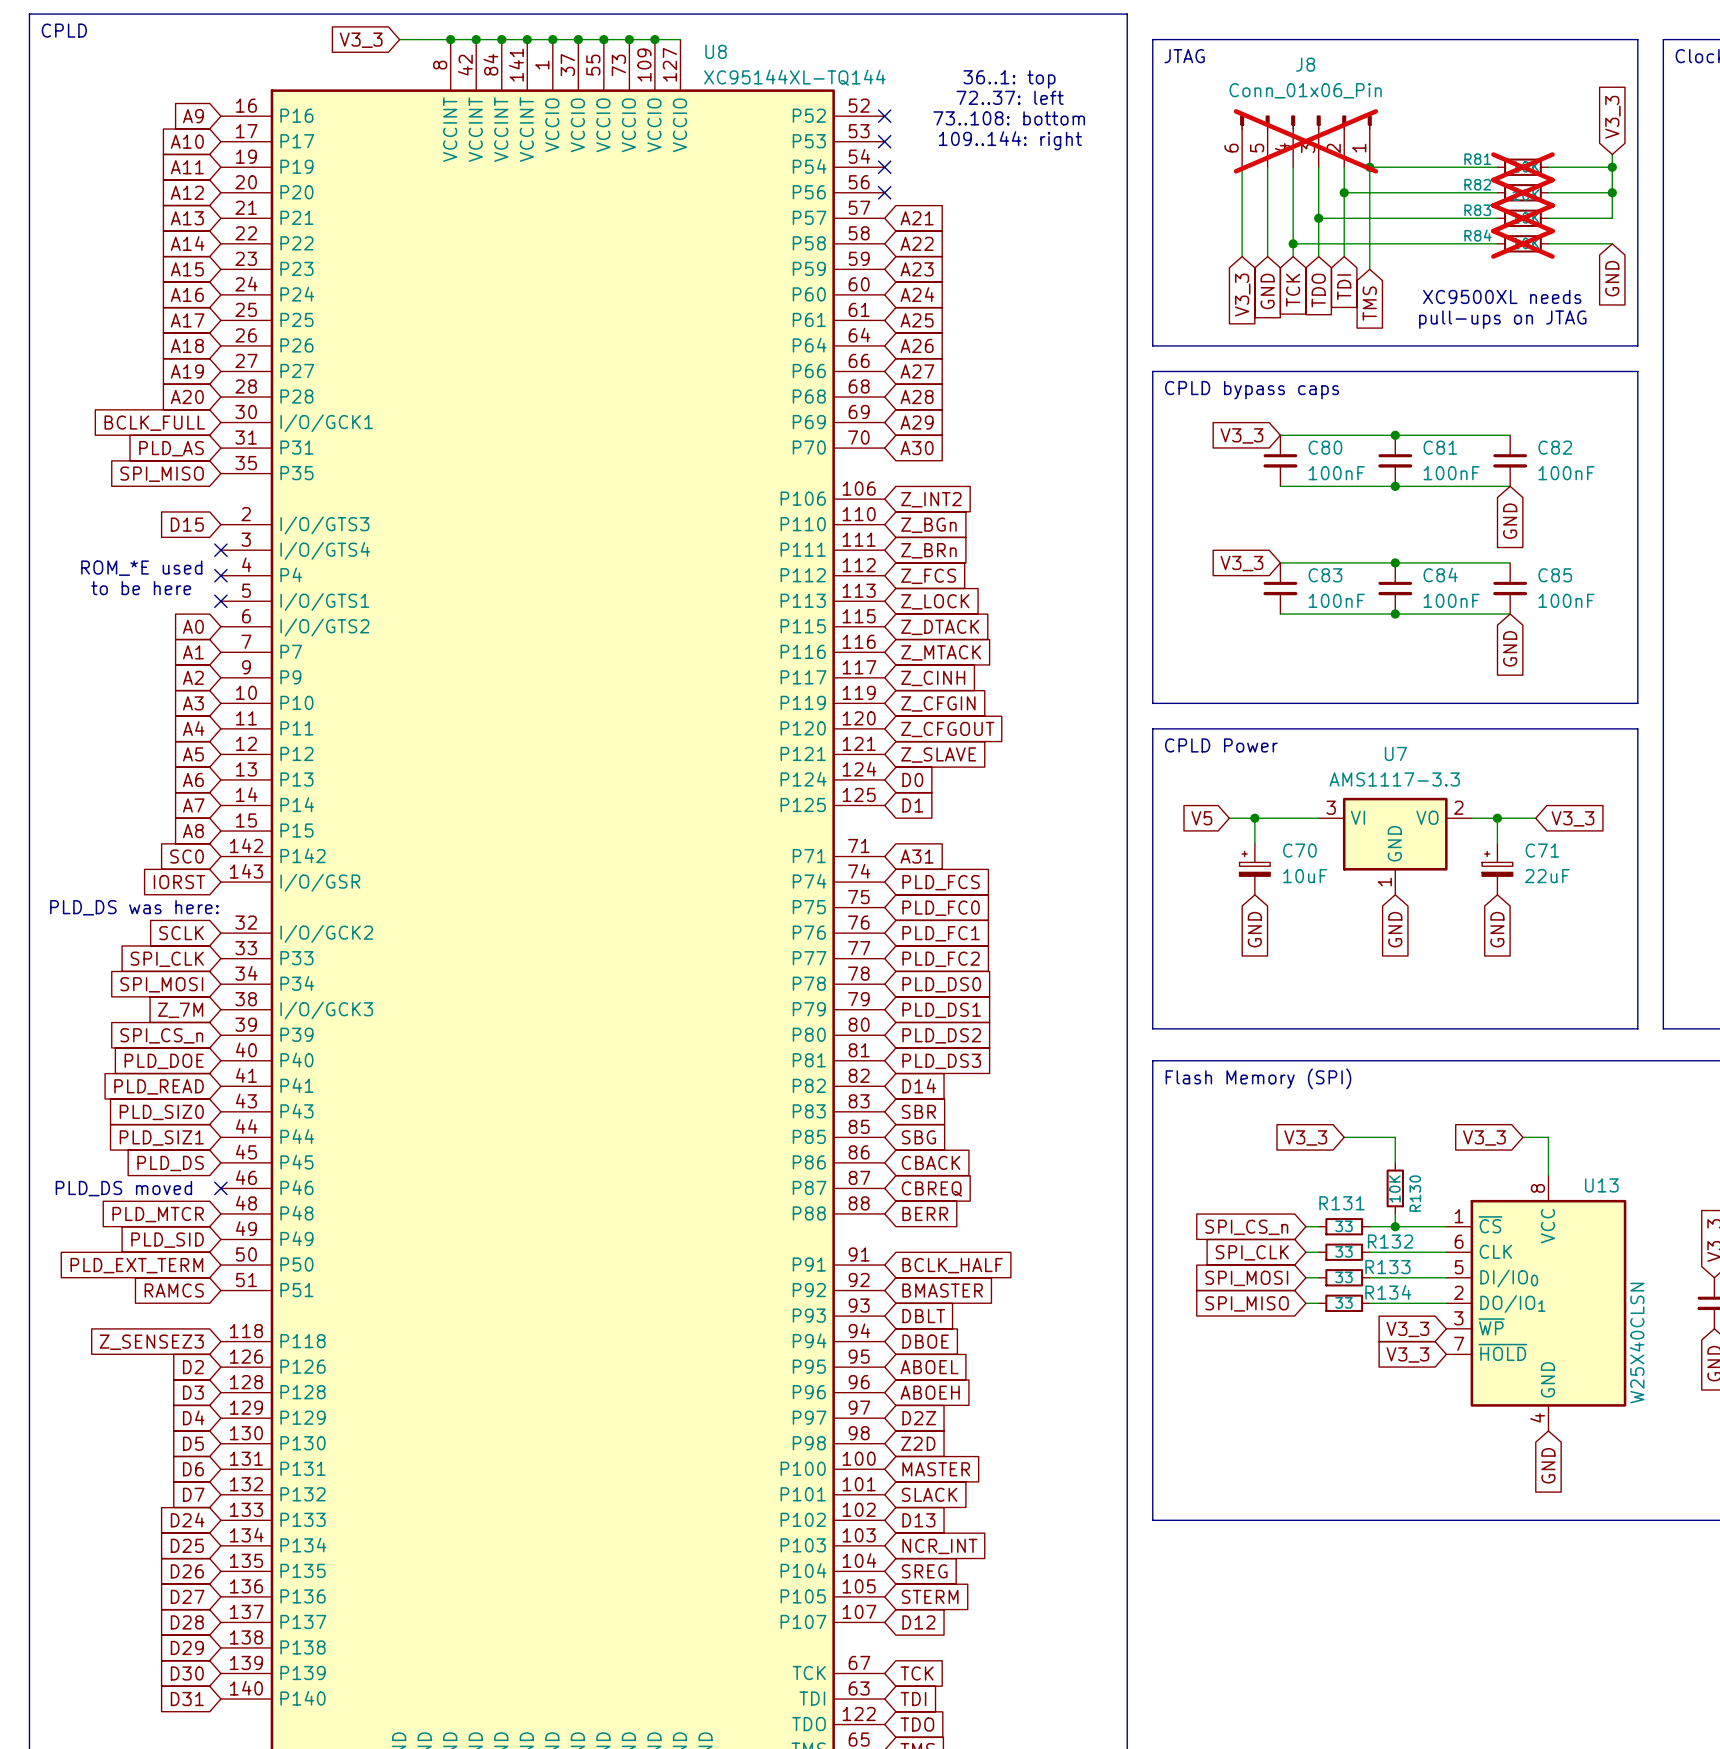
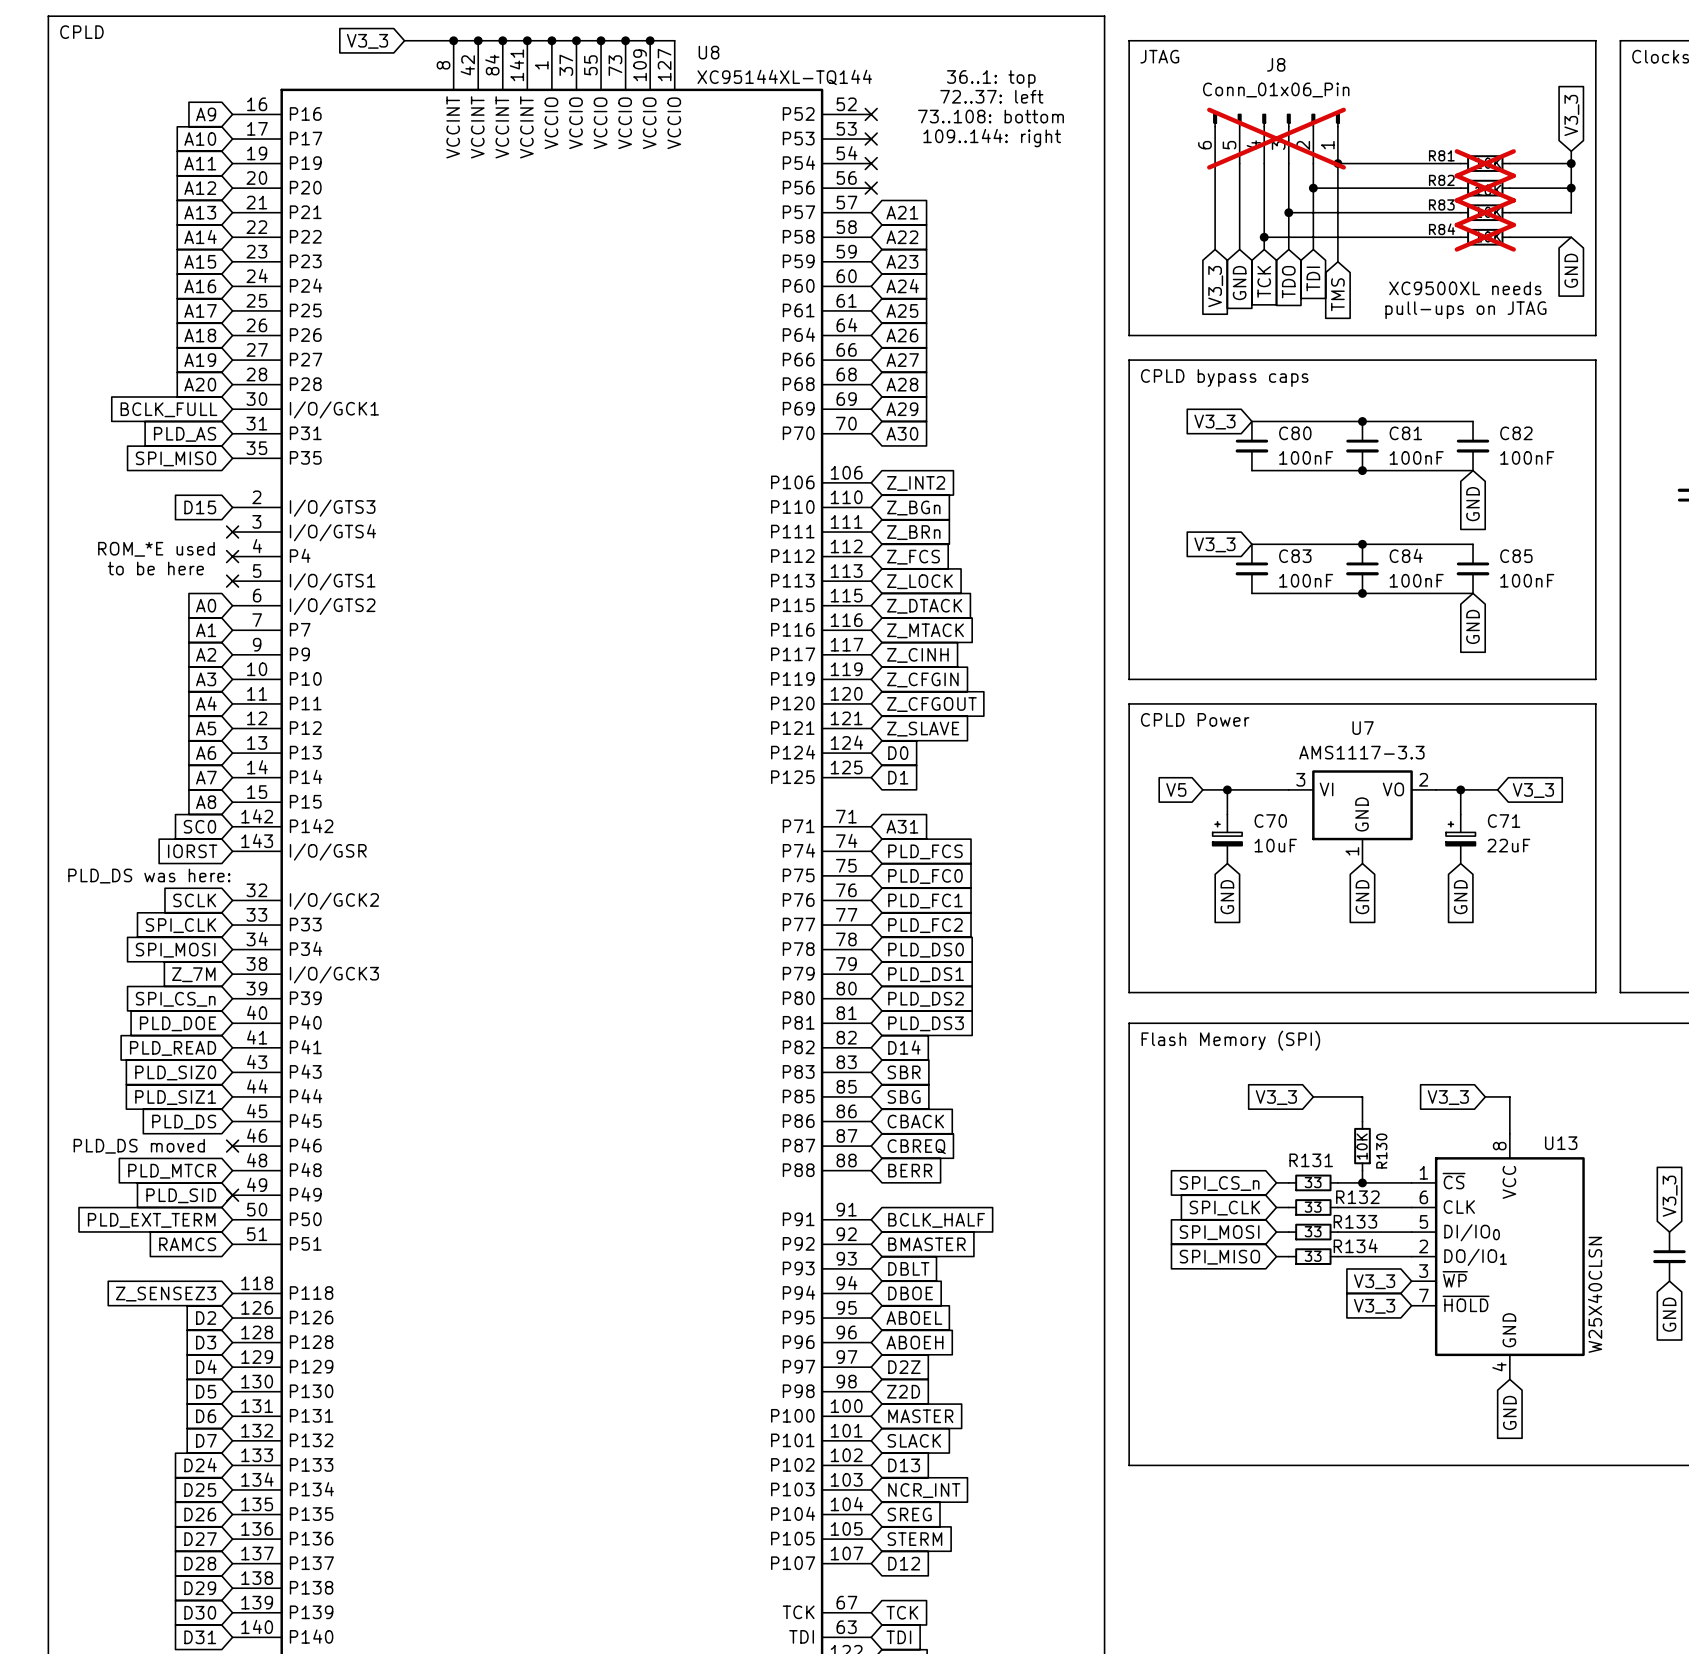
no-connect mark: none -> (232, 1195)

